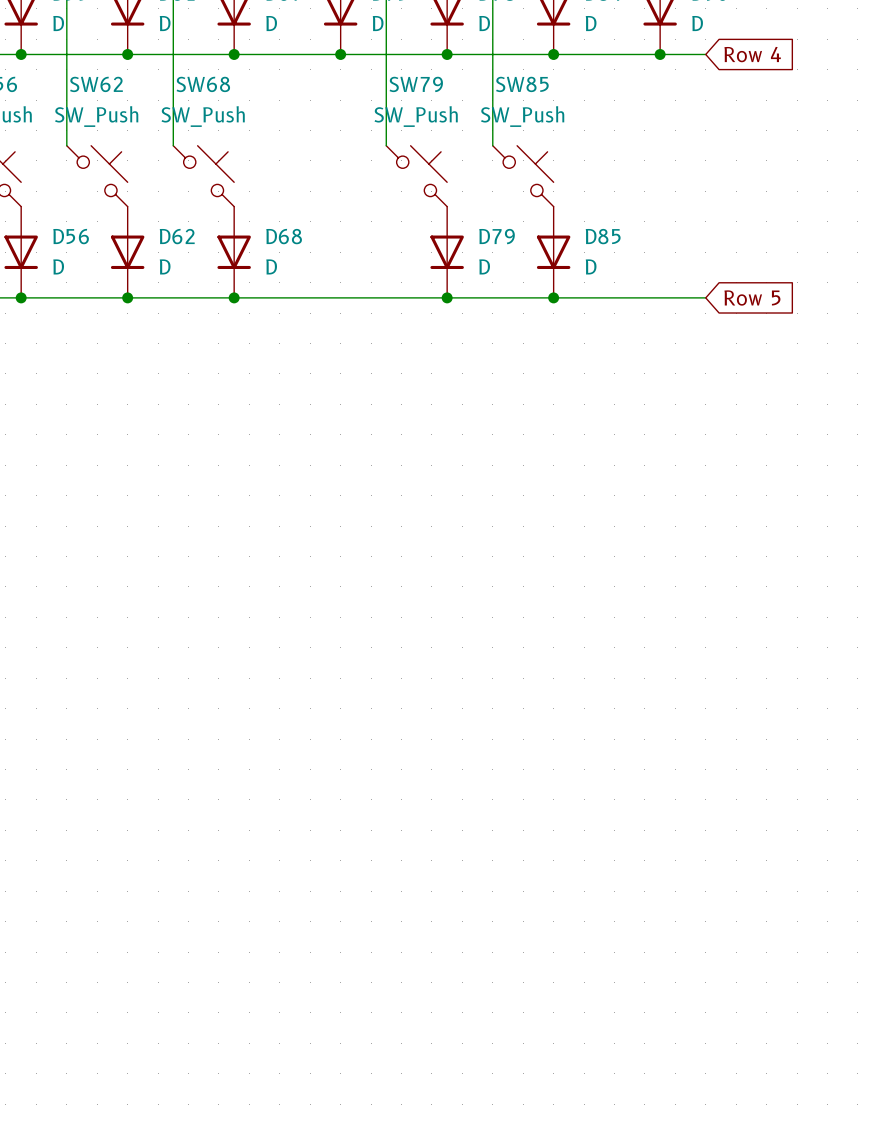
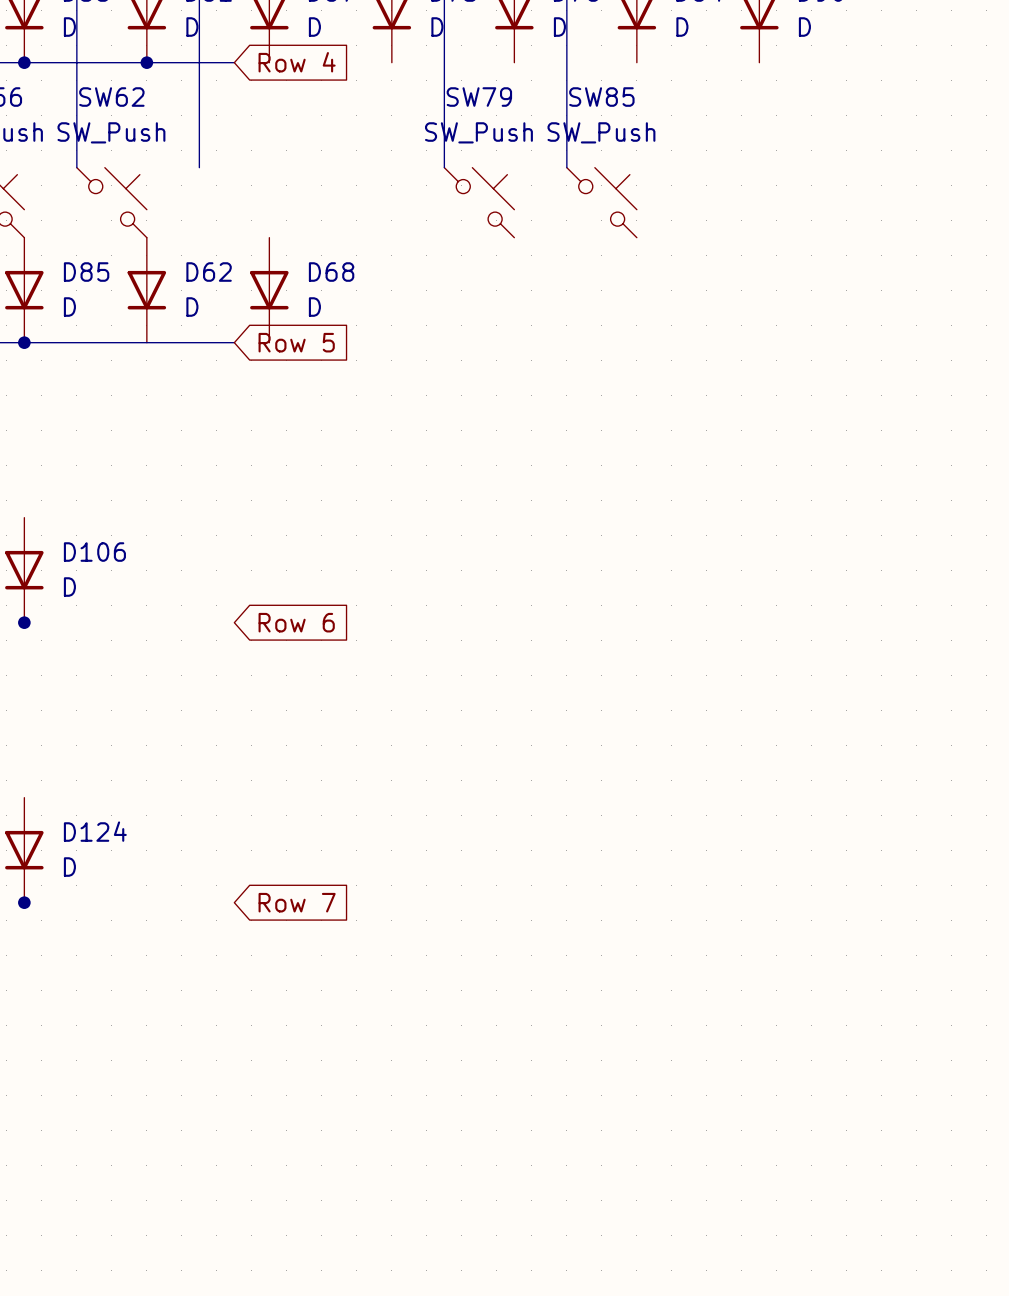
wire: (203, 54) (705, 54) -> none
junction: (234, 54) -> none
global label: none -> Row 4 (297, 62)
junction: (340, 54) -> none
junction: (447, 54) -> none
junction: (553, 54) -> none
junction: (660, 54) -> none
global label: Row 4 (752, 54) -> none
SW68: SW_Push (203, 176) -> none
D56 name: D56 (71, 236) -> D85 (86, 272)
D79: D (447, 252) -> none
D85: D (553, 252) -> none
junction: (127, 297) -> none
wire: (203, 297) (705, 297) -> none
junction: (234, 297) -> none
junction: (447, 297) -> none
junction: (553, 297) -> none
global label: none -> Row 5 (296, 342)
global label: Row 5 (752, 298) -> none
D106: none -> D (24, 570)
junction: none -> (24, 622)
global label: none -> Row 6 (296, 622)
D124: none -> D (24, 850)
junction: none -> (24, 902)
global label: none -> Row 7 (297, 902)

